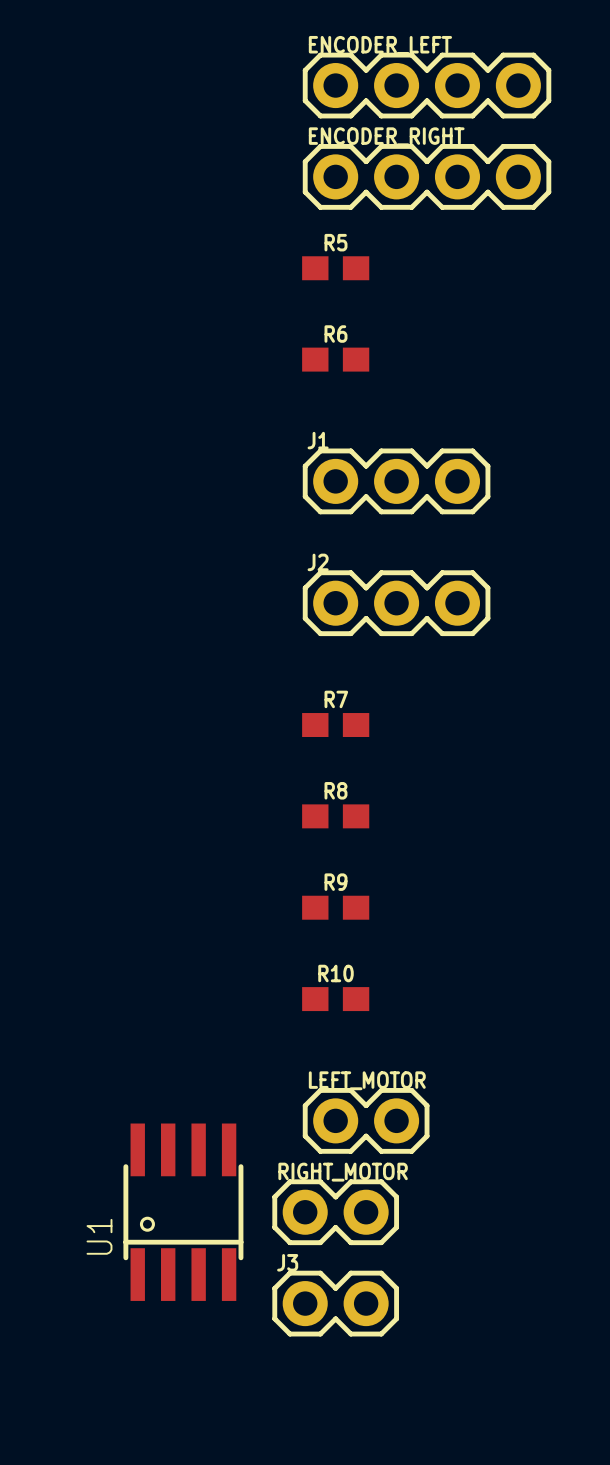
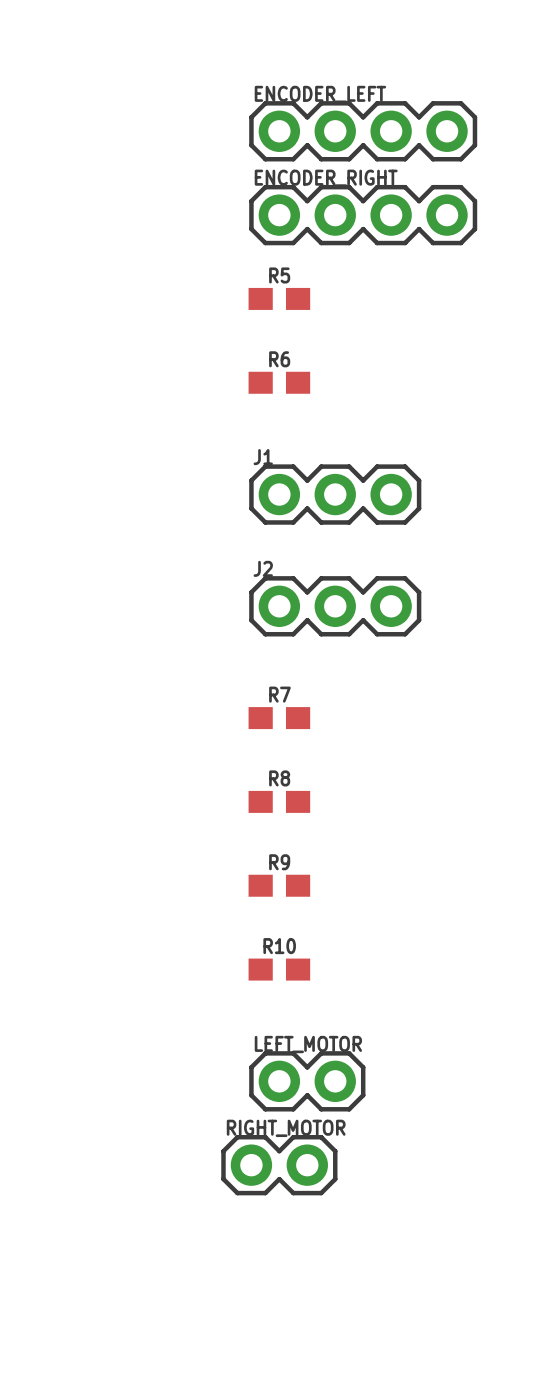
U1: (183, 1212) -> none
J3: (335, 1303) -> none

